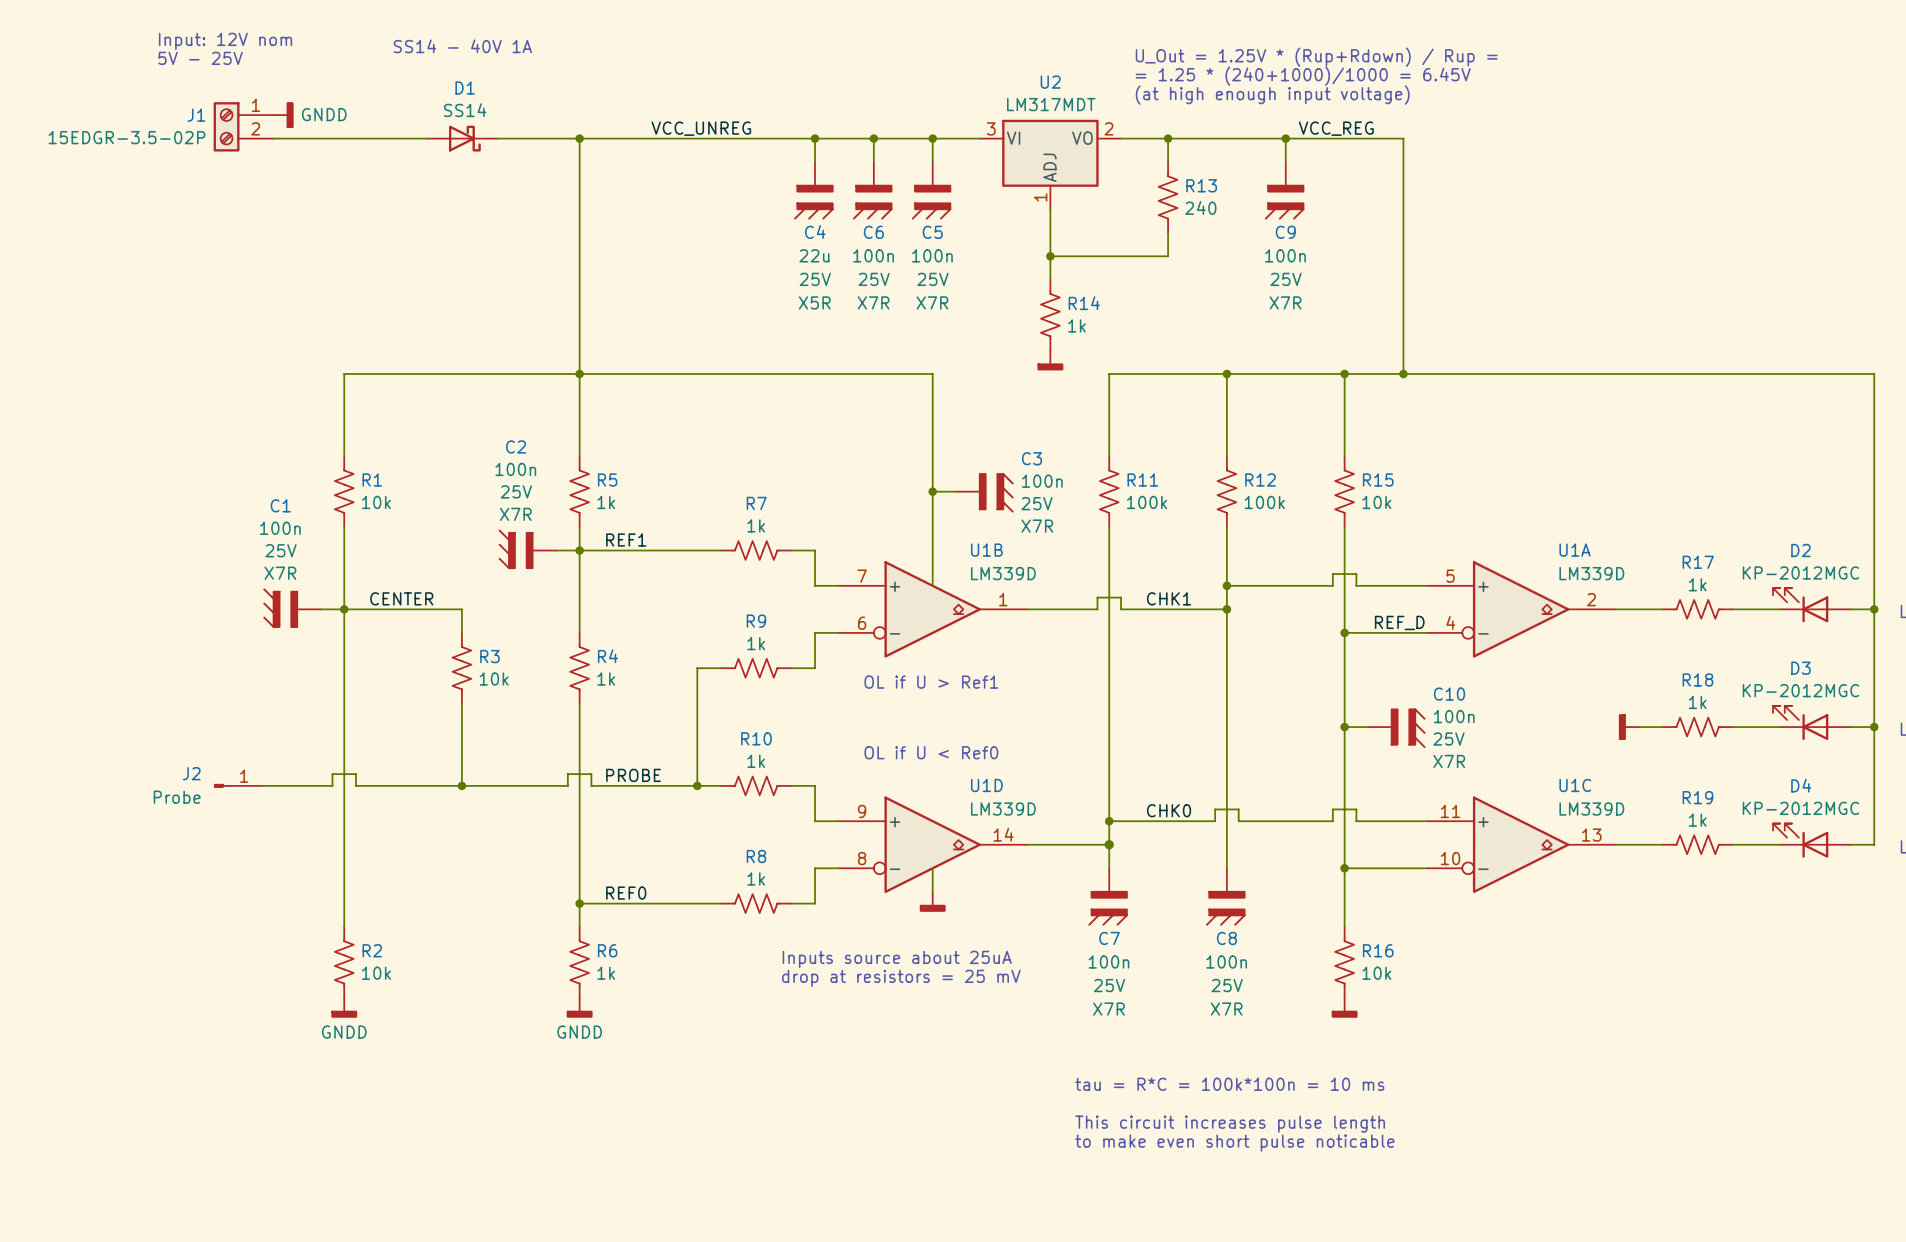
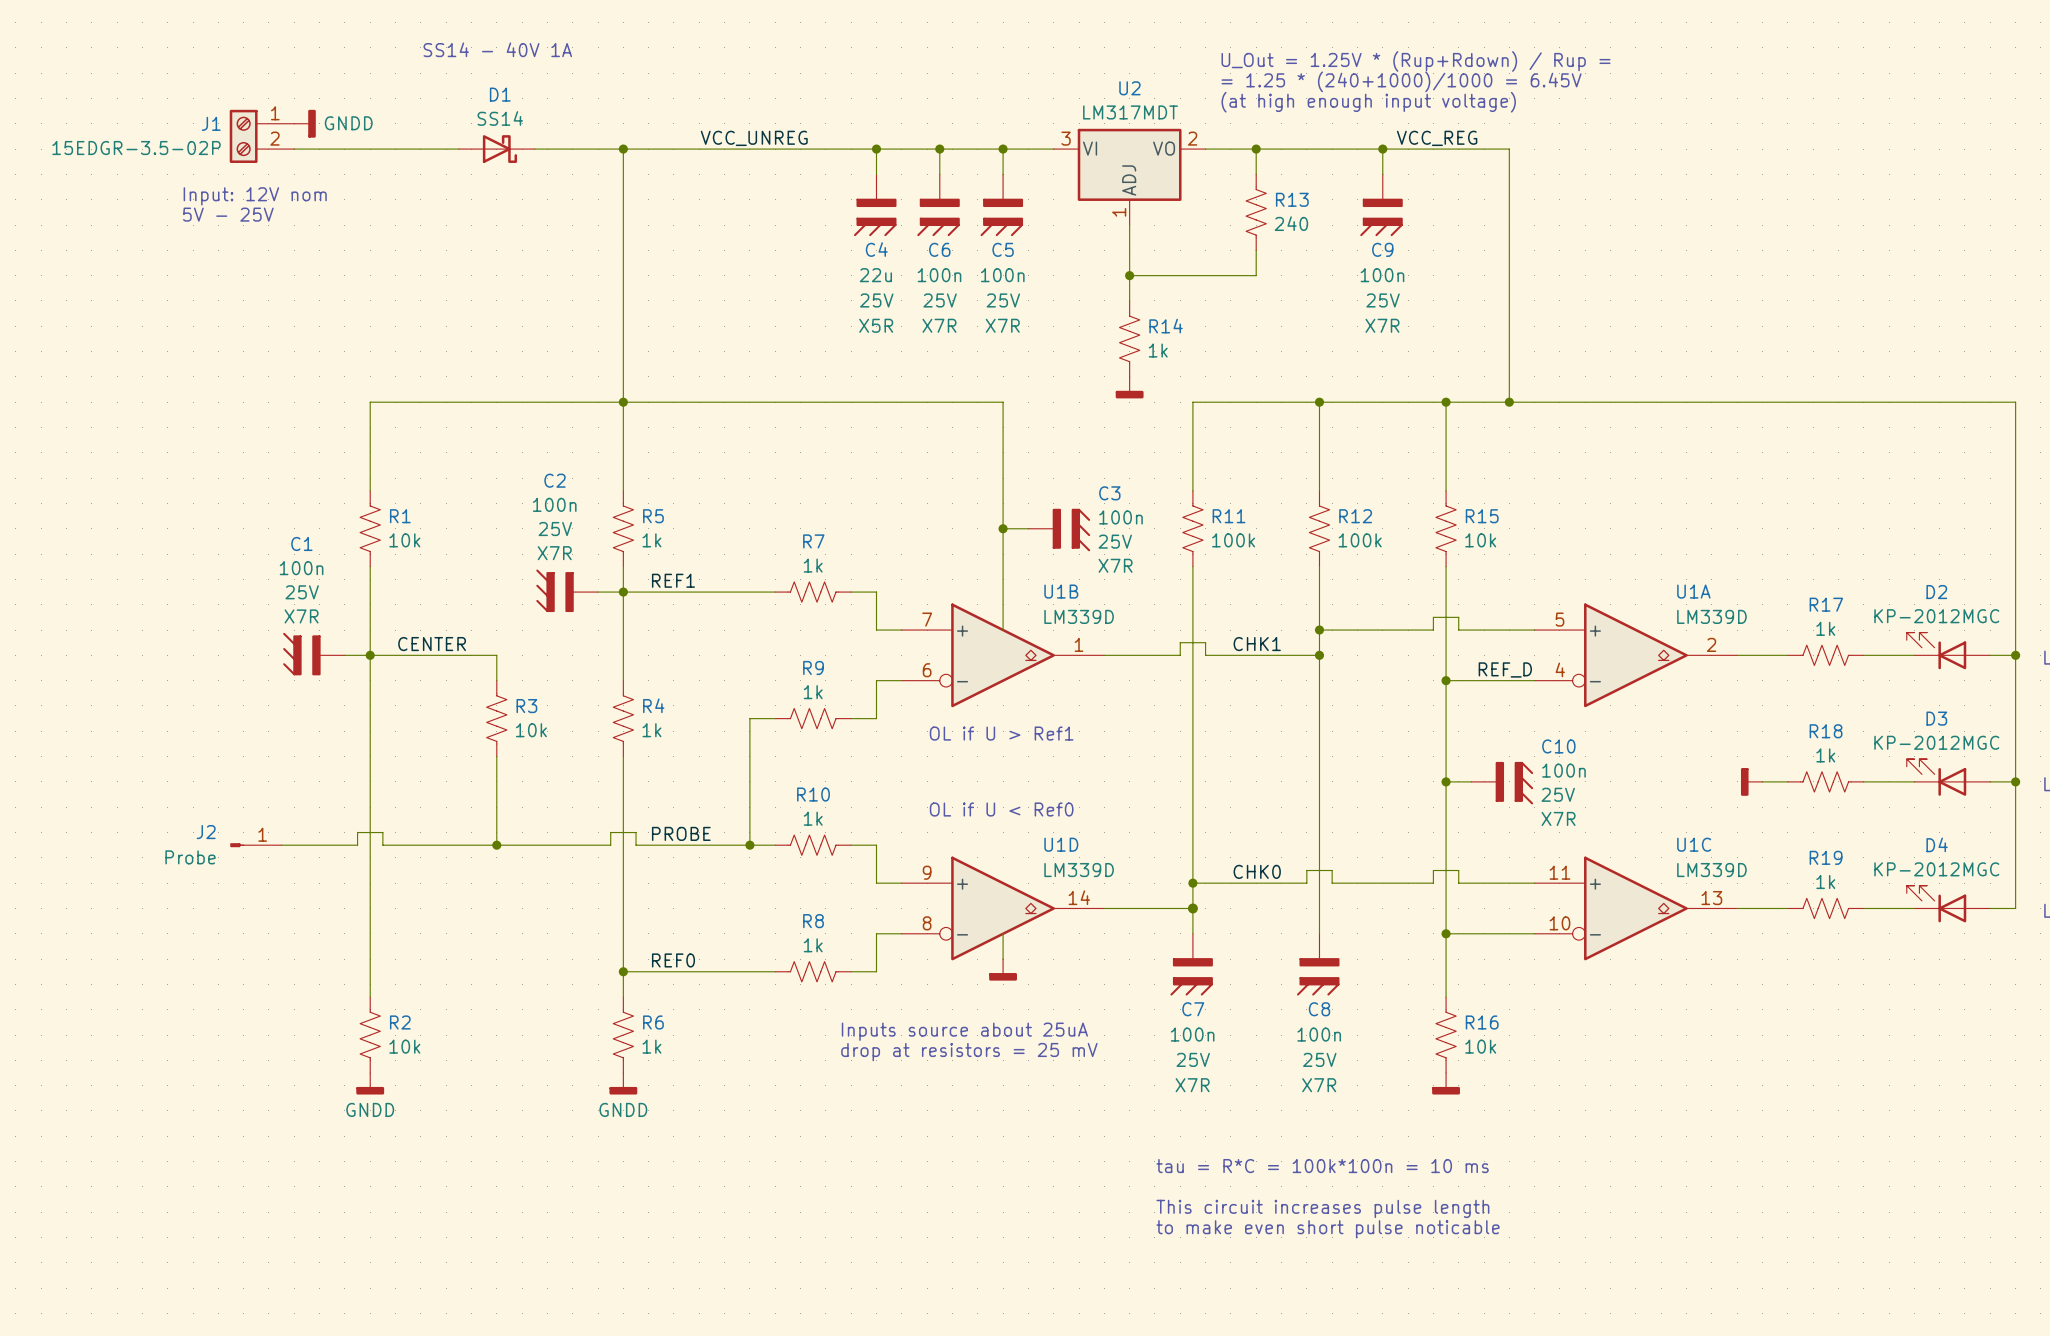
text position: Input: 12V nom (225, 41) -> Input: 12V nom (255, 196)
text position: 5V - 25V (200, 58) -> 5V - 25V (228, 214)

